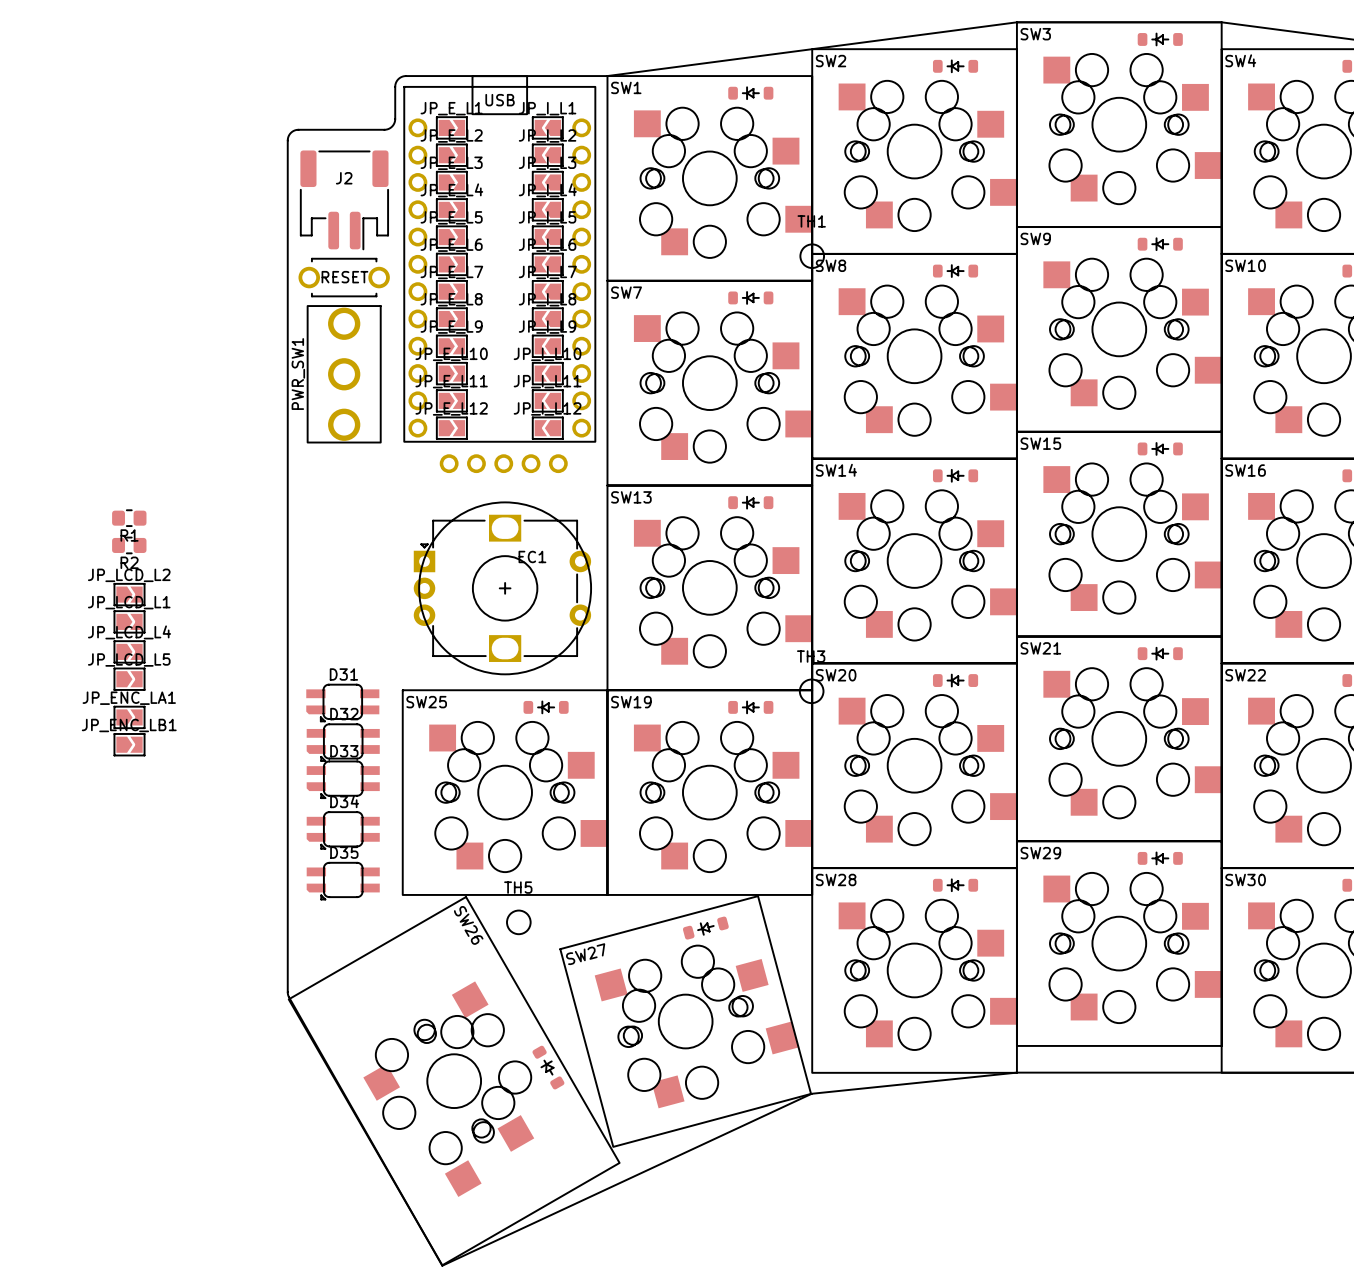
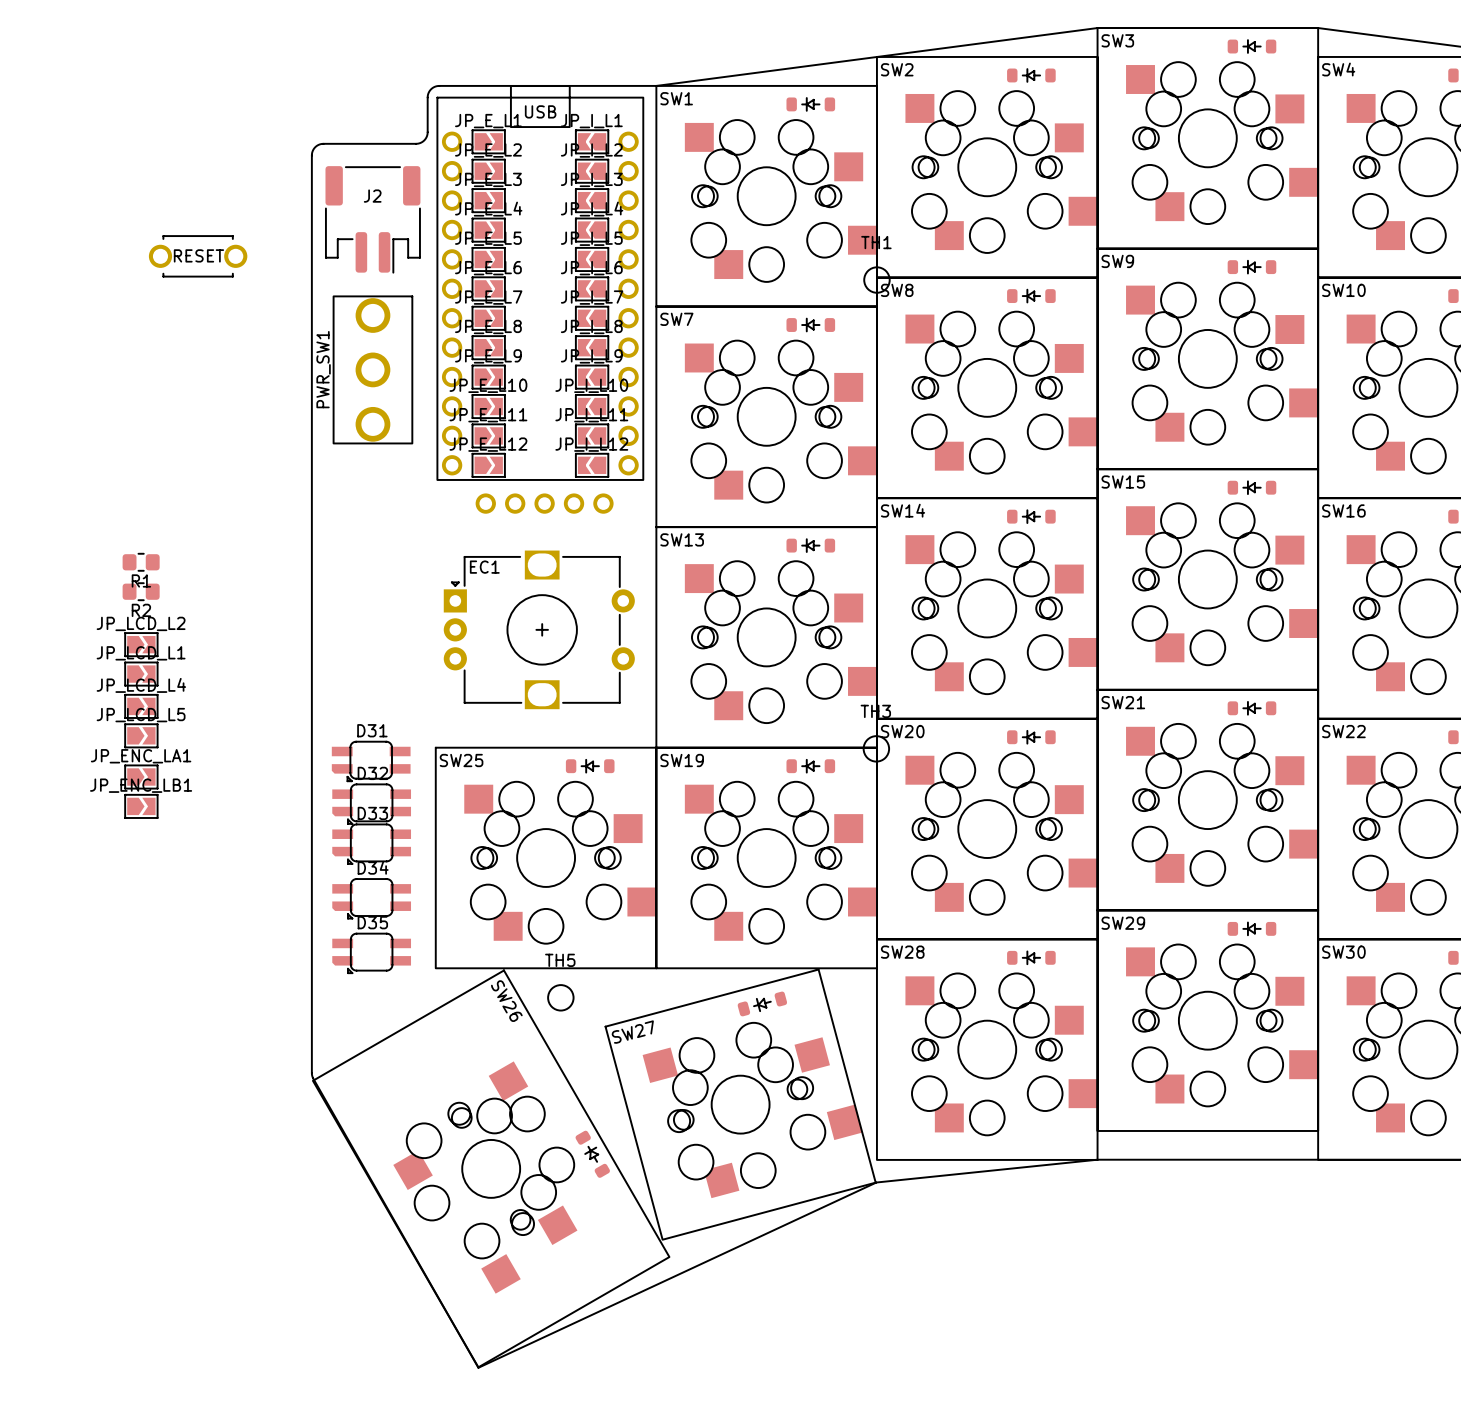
part position: (344, 277) -> (198, 256)
PWR_SW1 position: (344, 374) -> (372, 369)
EC1 footprint: [413, 501, 592, 675] -> [443, 550, 635, 710]
EC1 name position: EC1 (532, 556) -> EC1 (484, 567)

